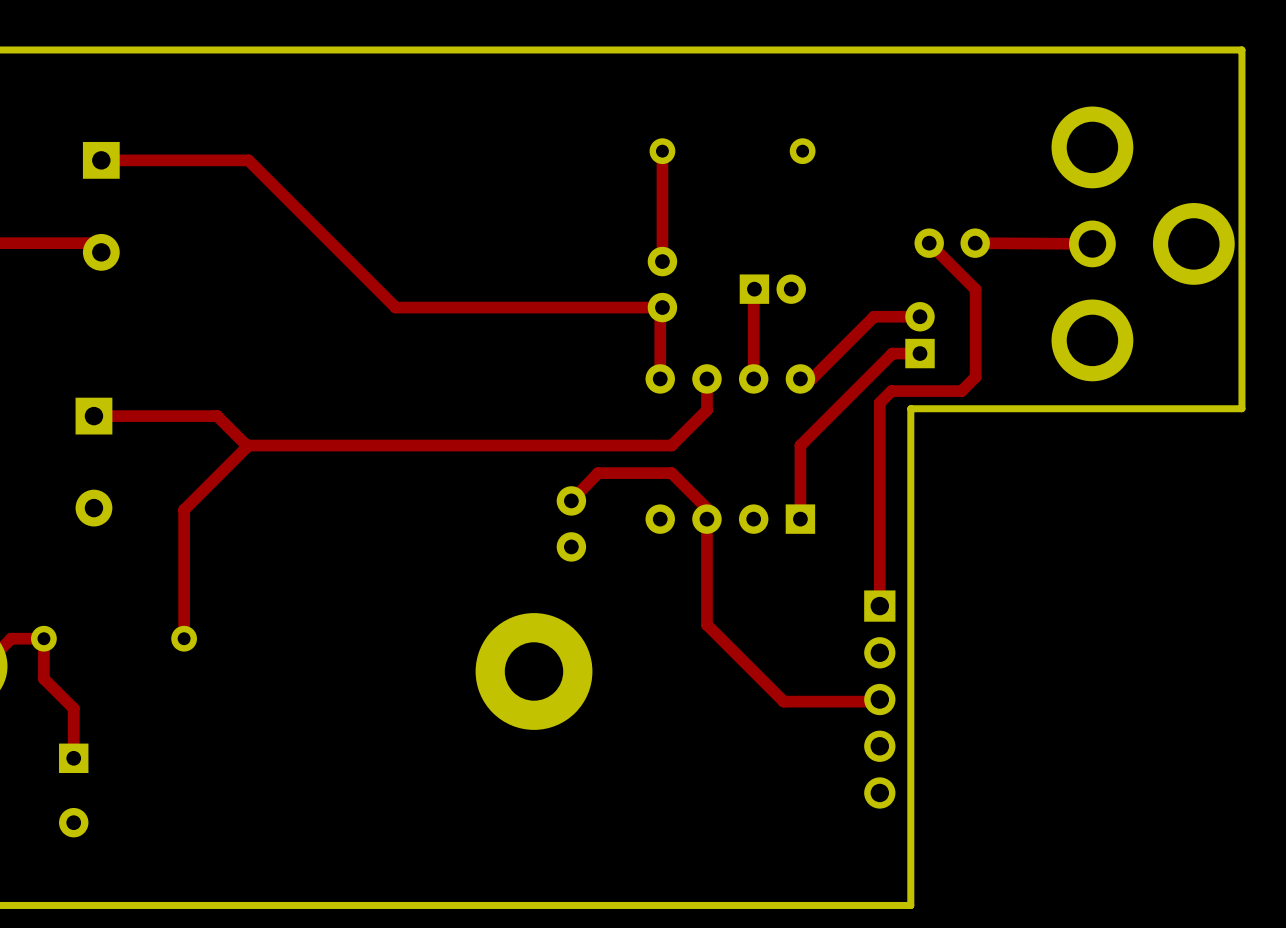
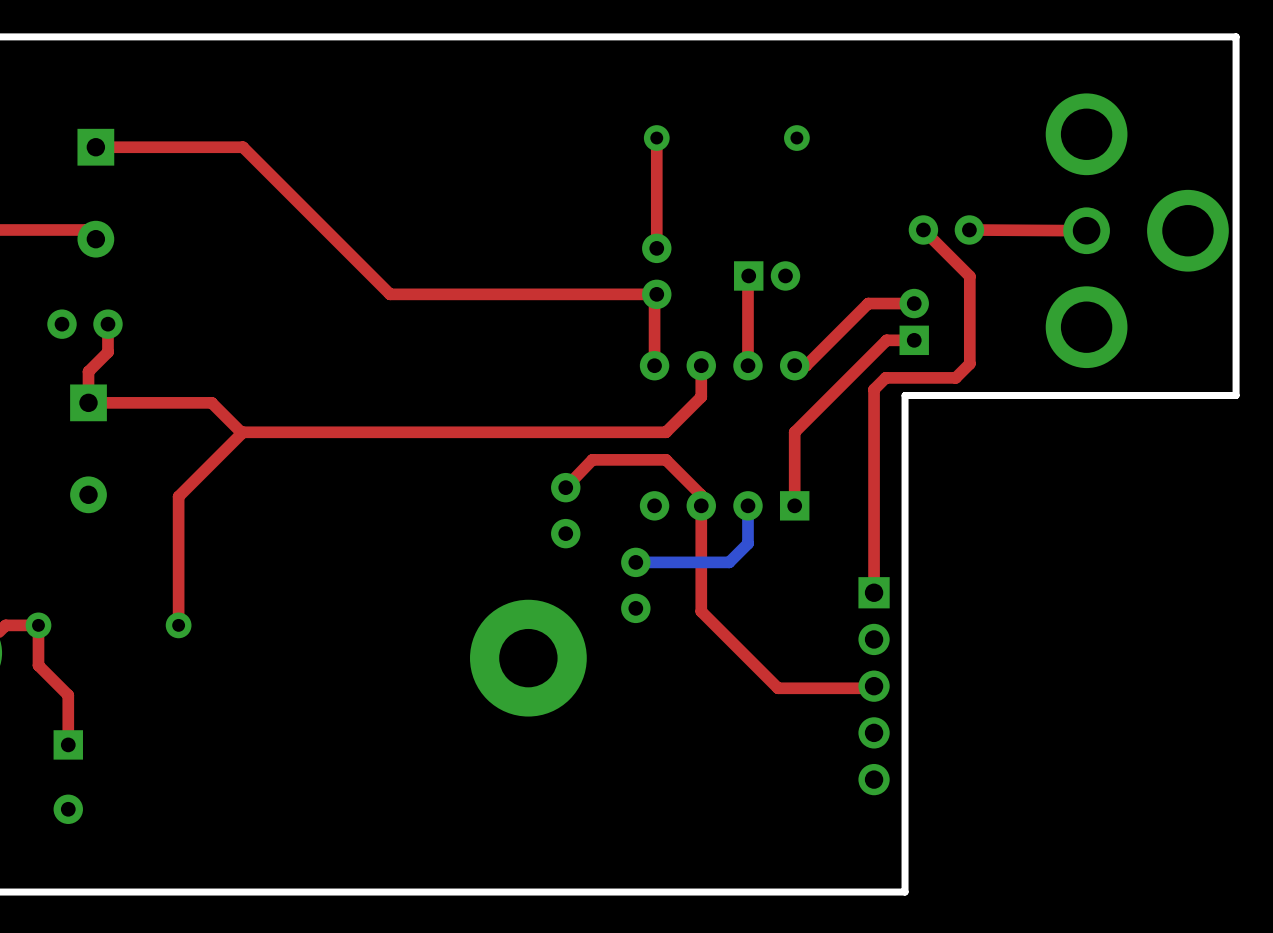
part: none -> (84, 324)
top track: none -> (107, 324) (107, 352) (88, 371) (88, 402)
bottom track: none -> (747, 505) (747, 543) (729, 562) (635, 562)
part: none -> (635, 585)

